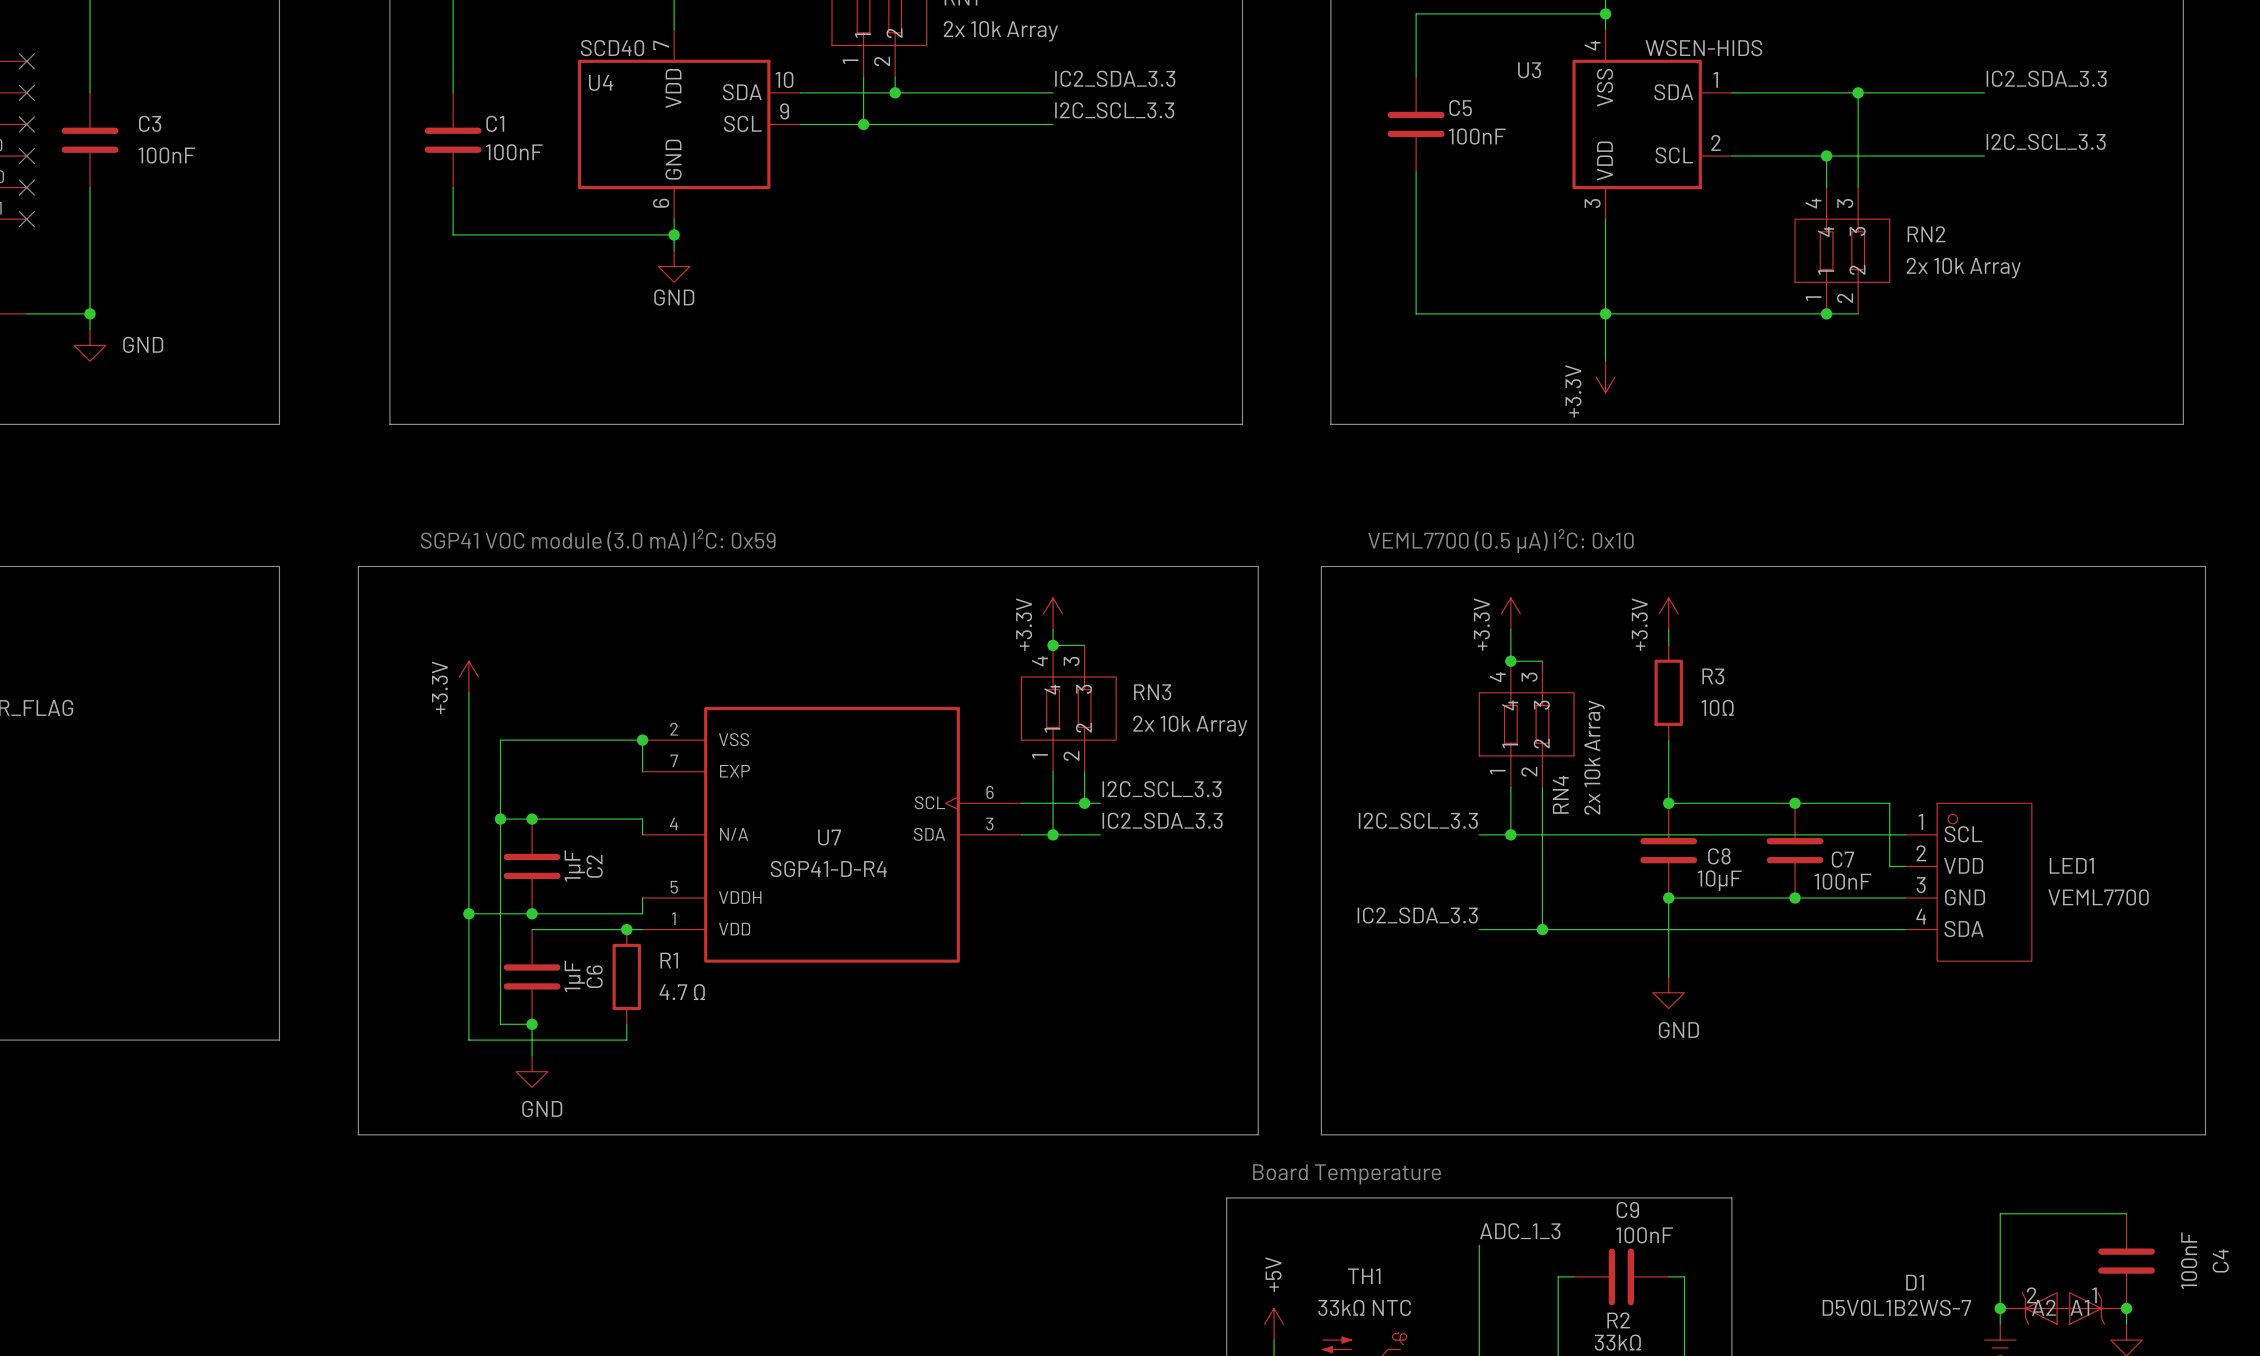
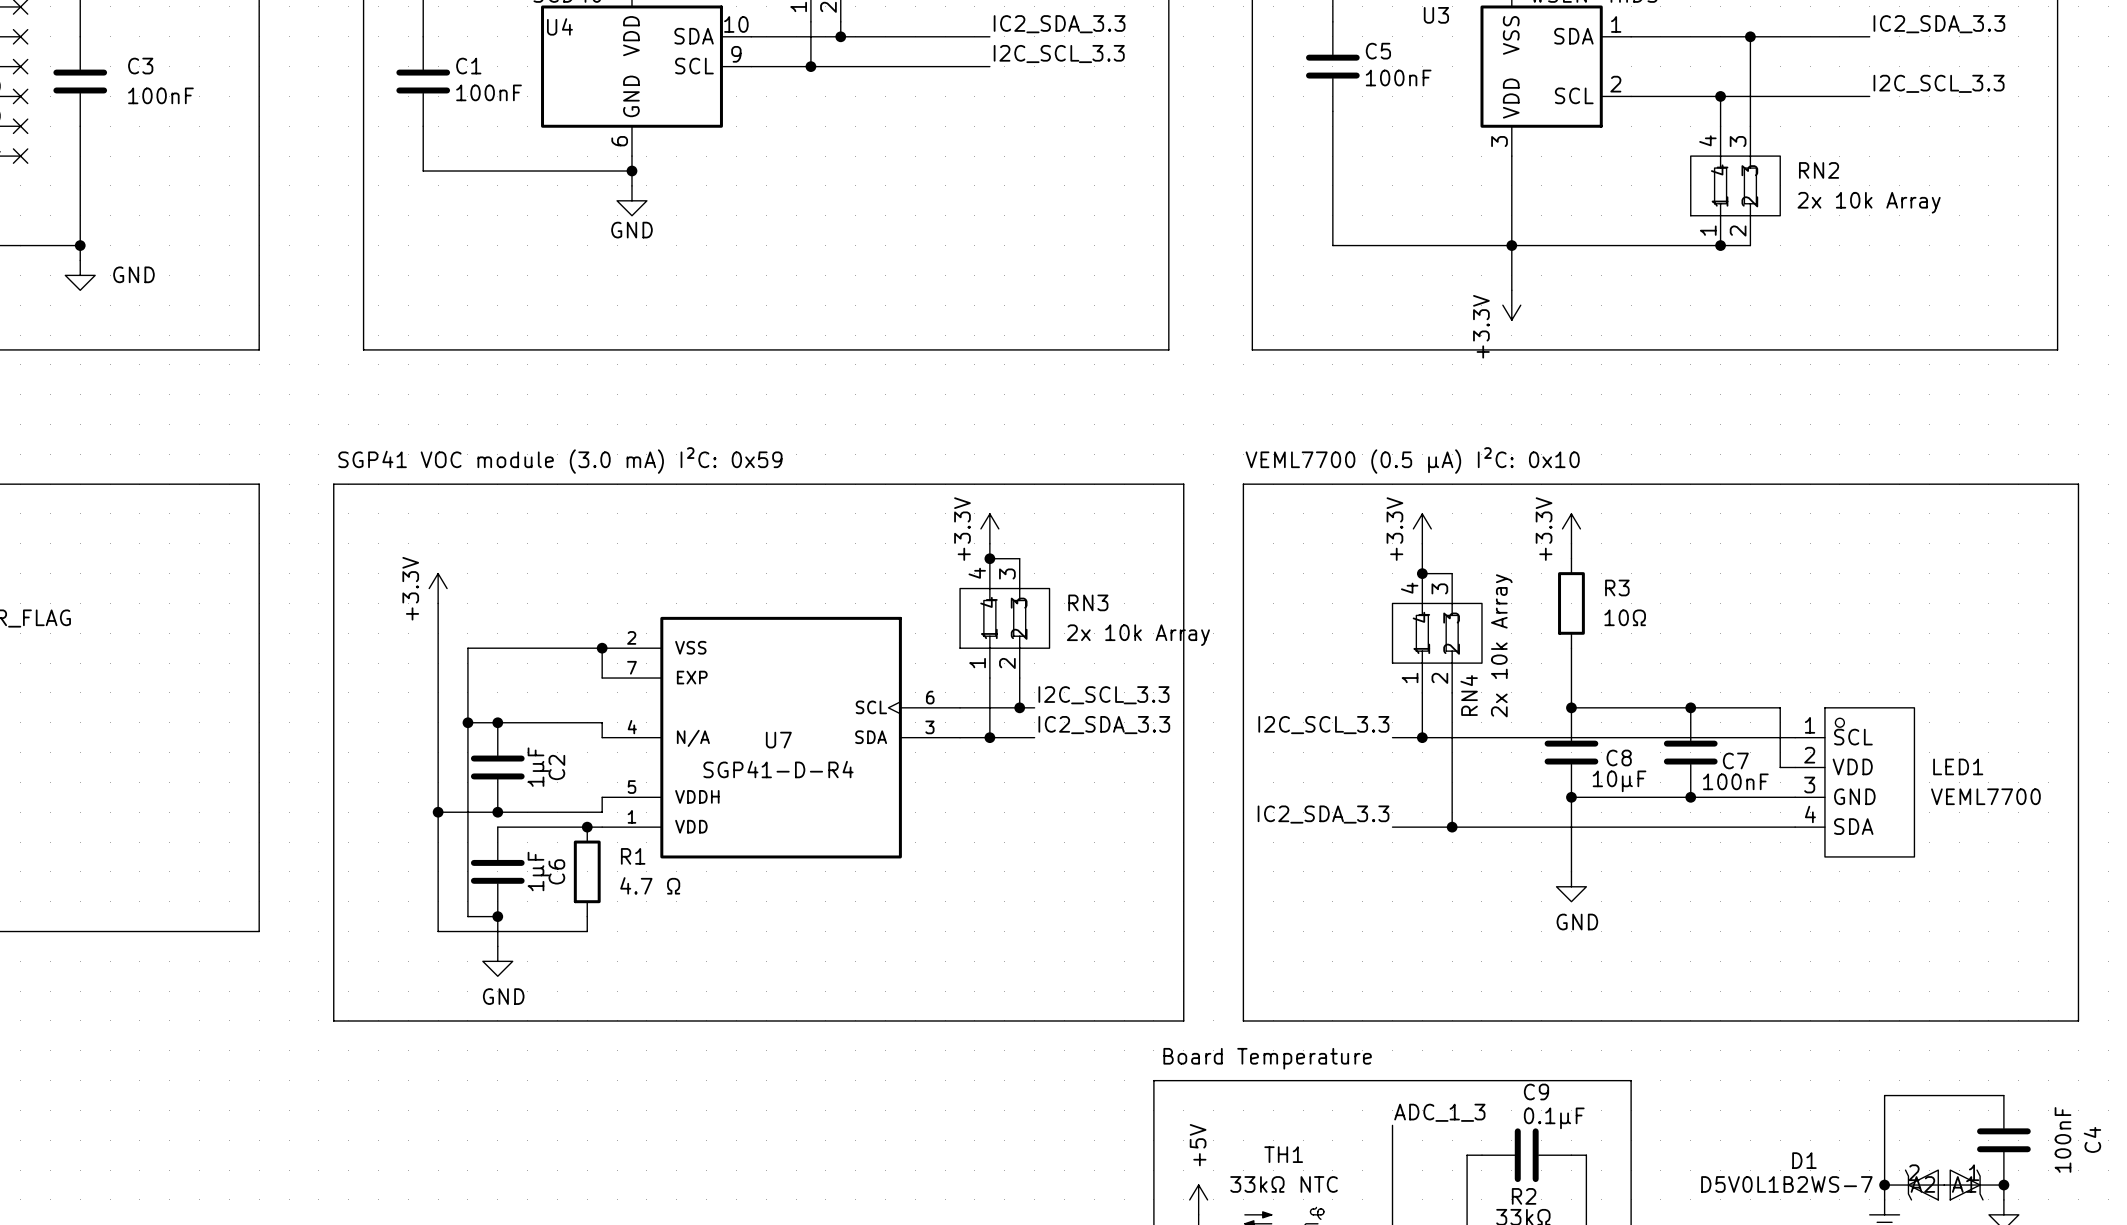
C9 value: 100nF (1644, 1235) -> 0.1µF (1554, 1118)

